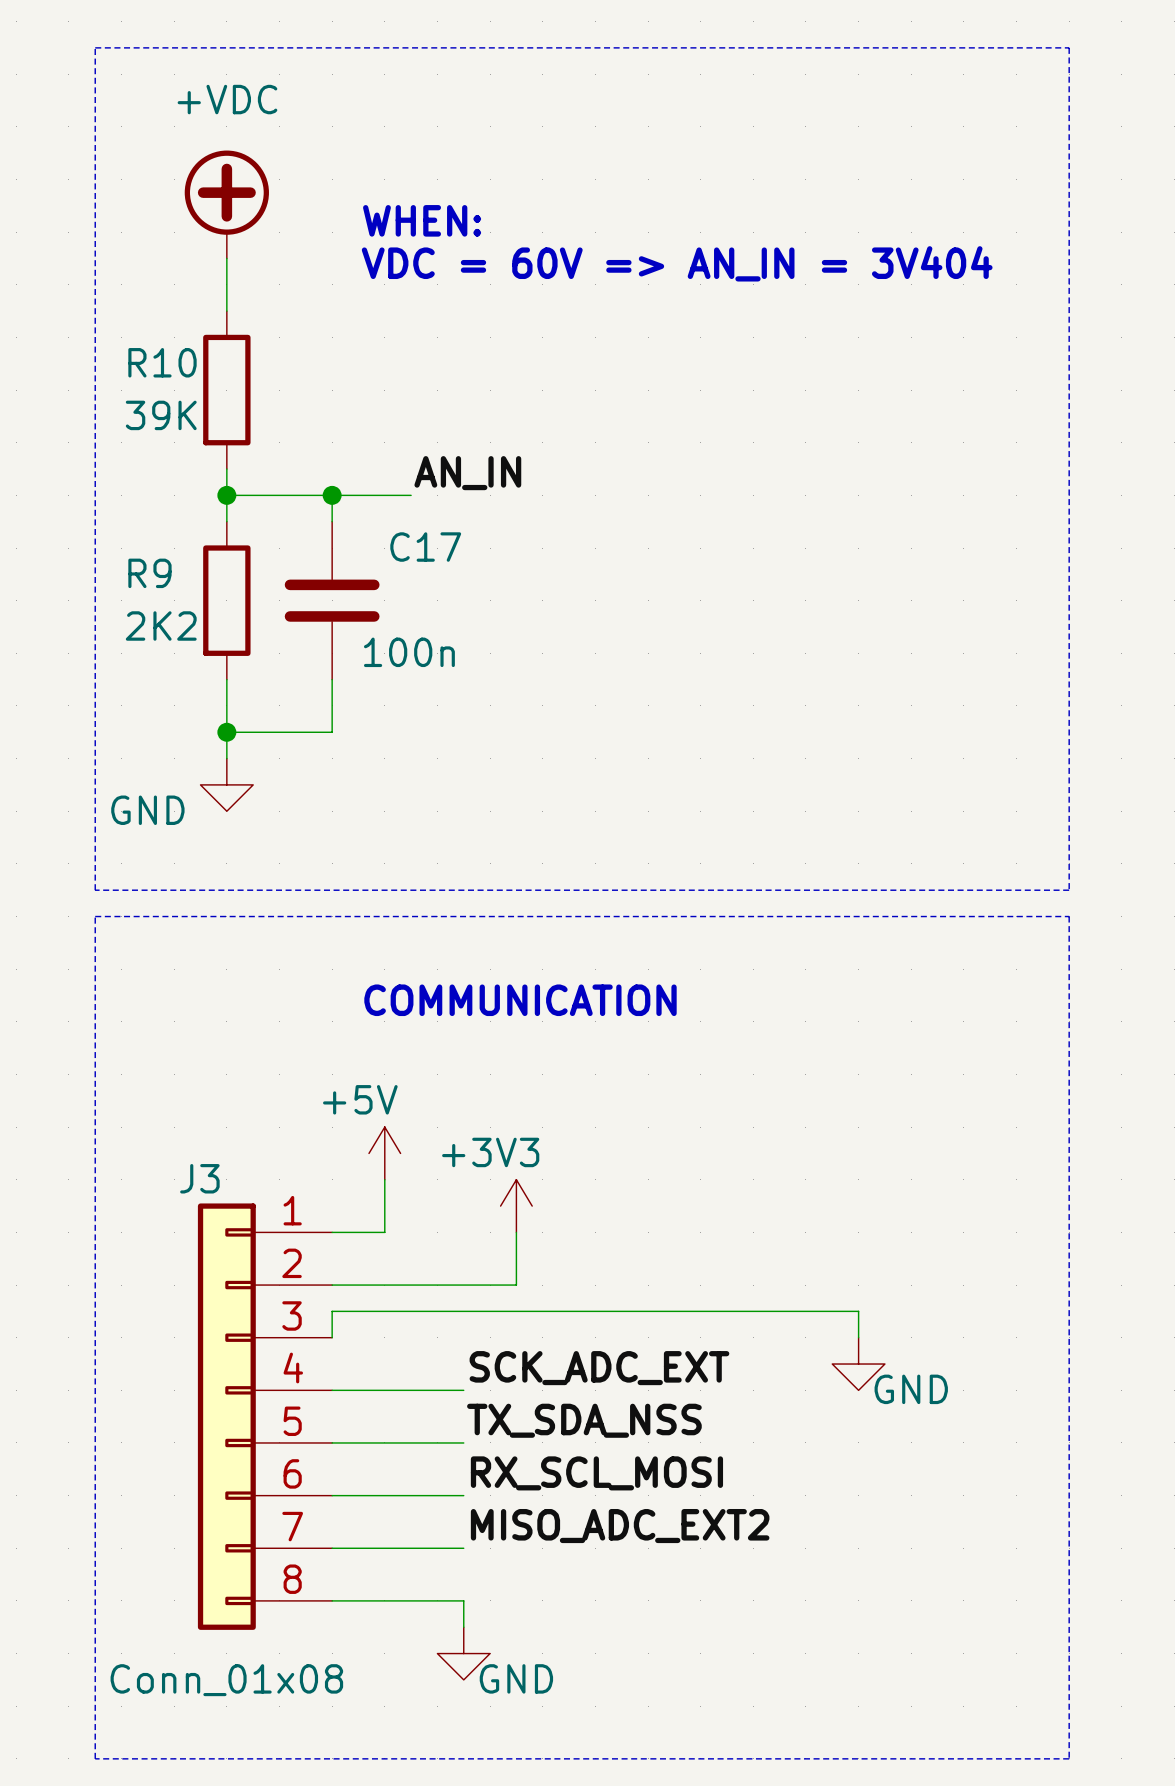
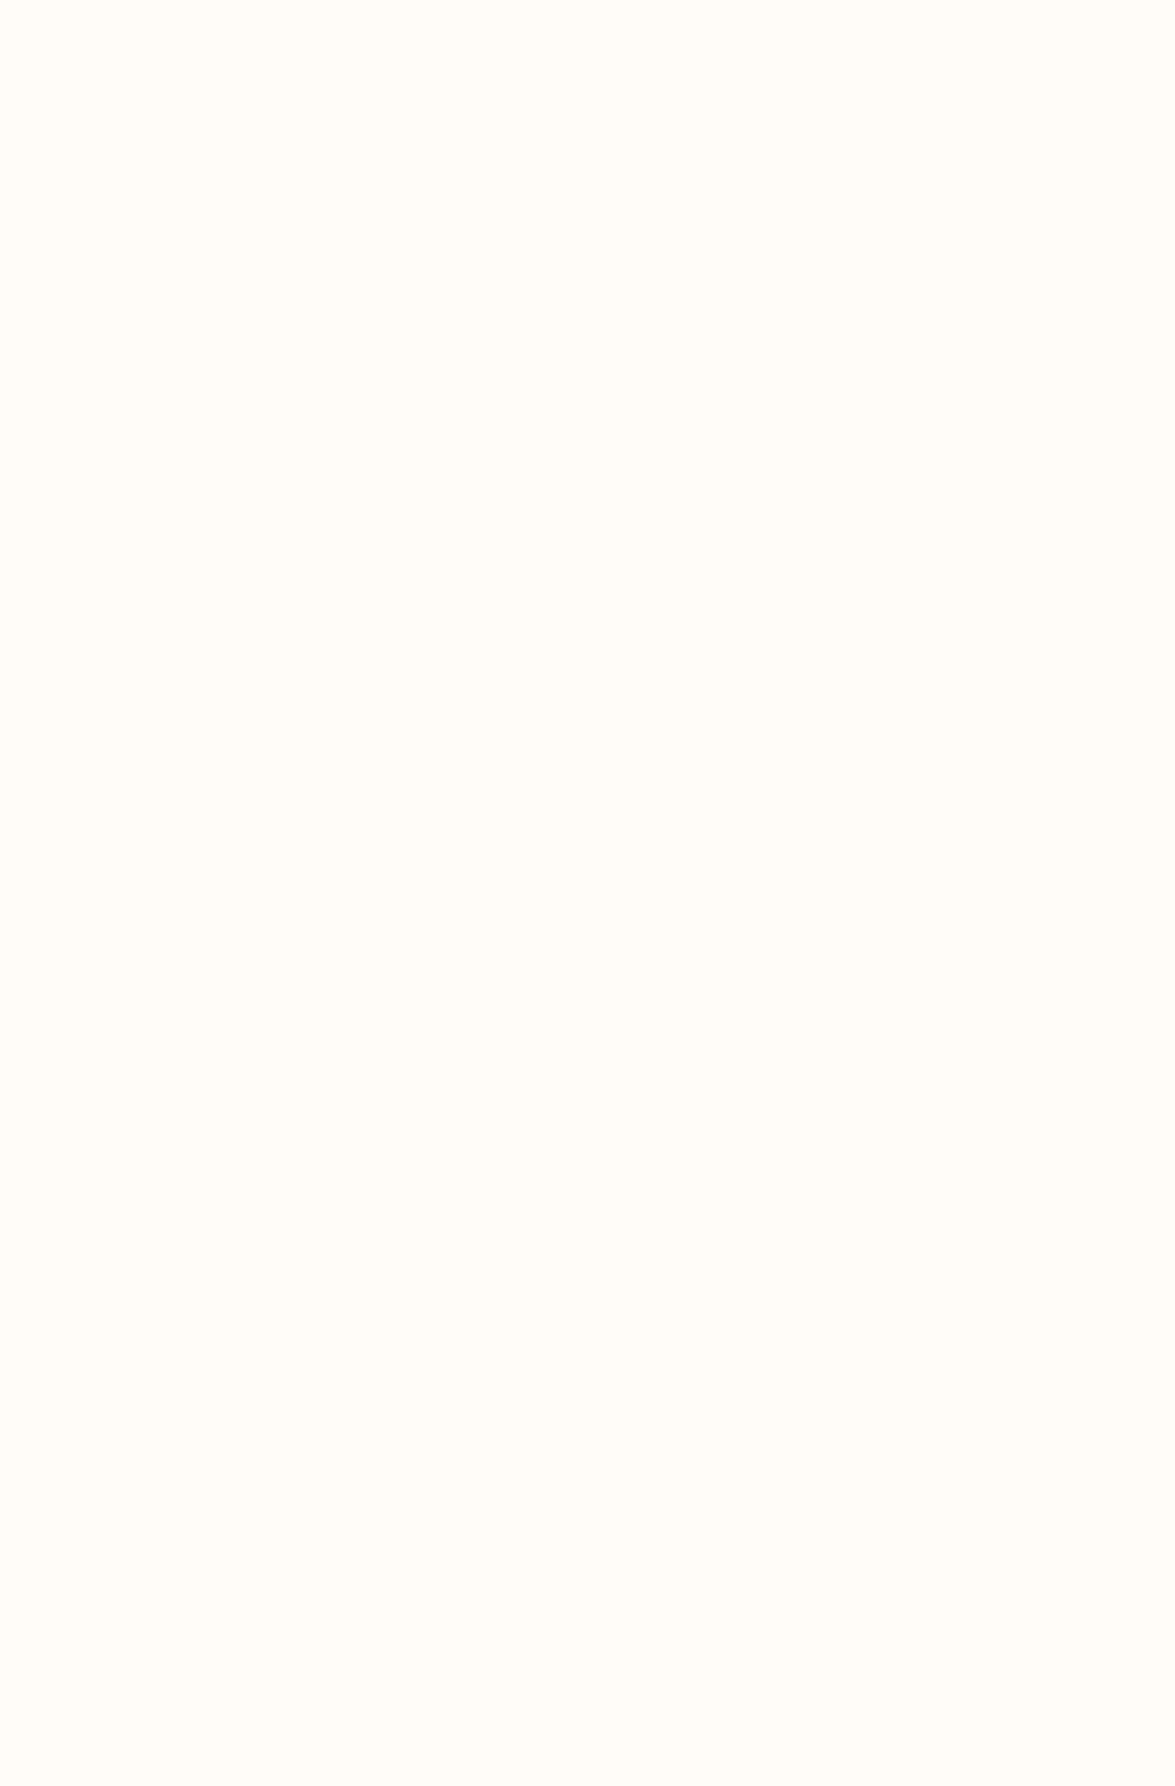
line: (95, 47) (1069, 47) (1069, 890) (95, 890) (95, 47) -> none
power symbol: +VDC (226, 204) -> none
text: WHEN: (422, 220) -> none
wire: (226, 258) (226, 311) -> none
text: VDC = 60V => AN_IN = 3V404 (677, 263) -> none
R10: 39K (226, 390) -> none
wire: (226, 469) (226, 521) -> none
label: AN_IN (467, 473) -> none
wire: (226, 495) (411, 495) -> none
junction: (226, 495) -> none
wire: (332, 495) (332, 521) -> none
junction: (332, 495) -> none
R9: 2K2 (226, 600) -> none
C17: 100n (332, 600) -> none
wire: (226, 679) (226, 758) -> none
wire: (332, 679) (332, 732) (226, 732) -> none
junction: (226, 732) -> none
power symbol: GND (226, 784) -> none
line: (95, 916) (95, 1758) (1069, 1758) (1069, 916) (95, 916) -> none
text: COMMUNICATION (520, 1000) -> none
power symbol: +5V (384, 1153) -> none
wire: (384, 1179) (384, 1232) (332, 1232) -> none
power symbol: +3V3 (516, 1206) -> none
wire: (516, 1232) (516, 1285) (332, 1285) -> none
wire: (332, 1337) (332, 1311) (858, 1311) (858, 1337) -> none
power symbol: GND (858, 1364) -> none
label: SCK_ADC_EXT (599, 1368) -> none
wire: (332, 1390) (463, 1390) -> none
J3: Conn_01x08 (265, 1416) -> none
label: TX_SDA_NSS (584, 1420) -> none
wire: (332, 1442) (463, 1442) -> none
label: RX_SCL_MOSI (596, 1473) -> none
wire: (332, 1495) (463, 1495) -> none
label: MISO_ADC_EXT2 (620, 1526) -> none
wire: (332, 1548) (463, 1548) -> none
wire: (332, 1600) (463, 1600) (463, 1627) -> none
power symbol: GND (463, 1653) -> none

